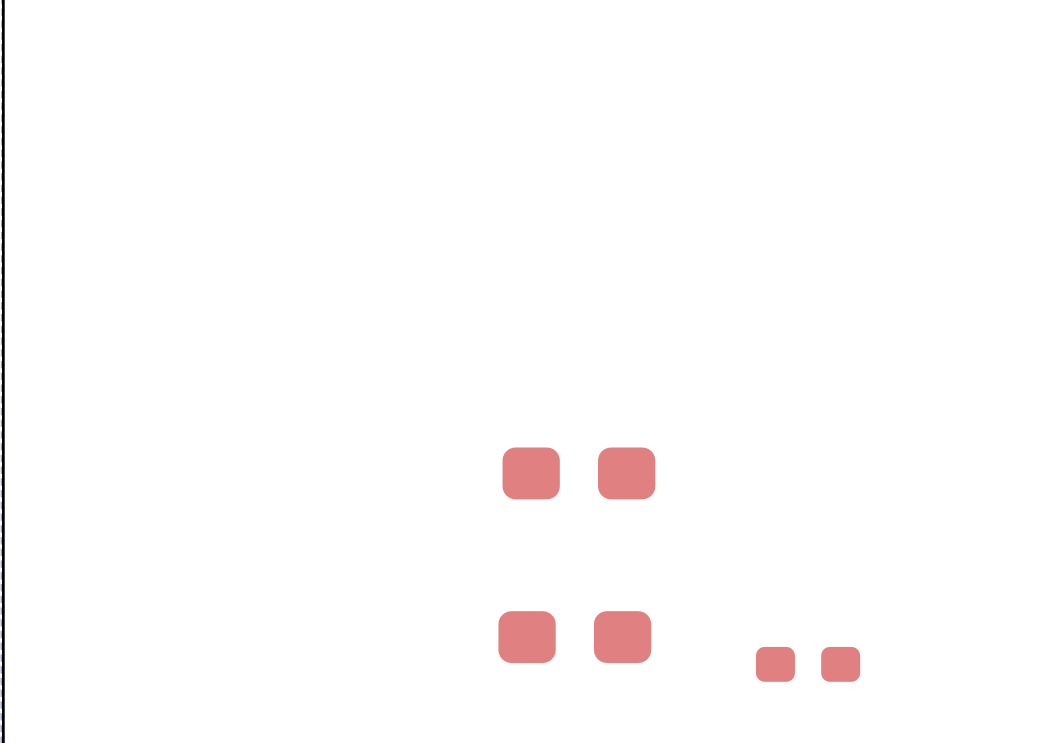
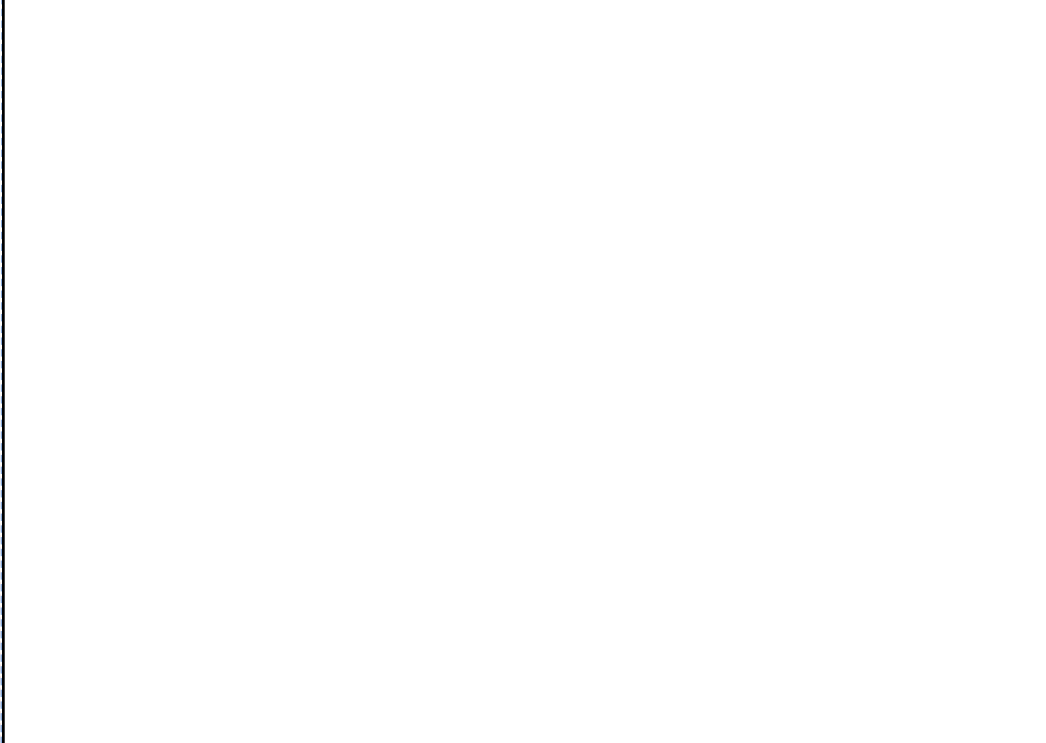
part: (578, 473) -> none
part: (574, 637) -> none
part: (808, 664) -> none

